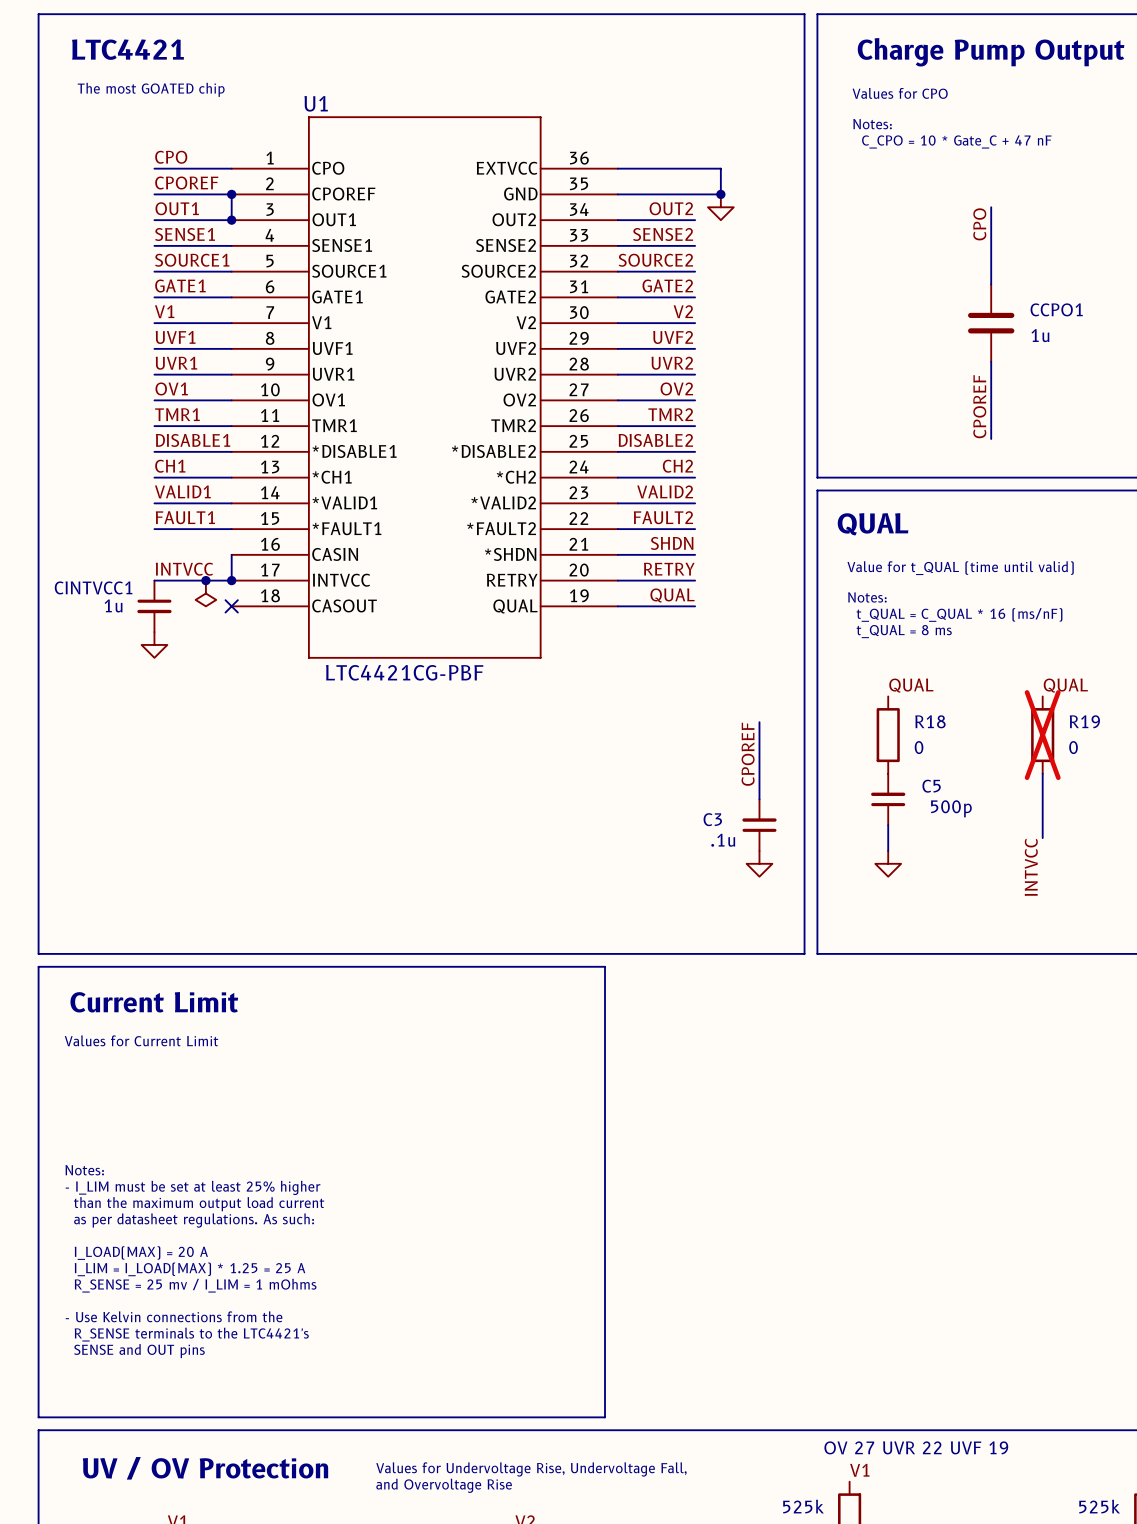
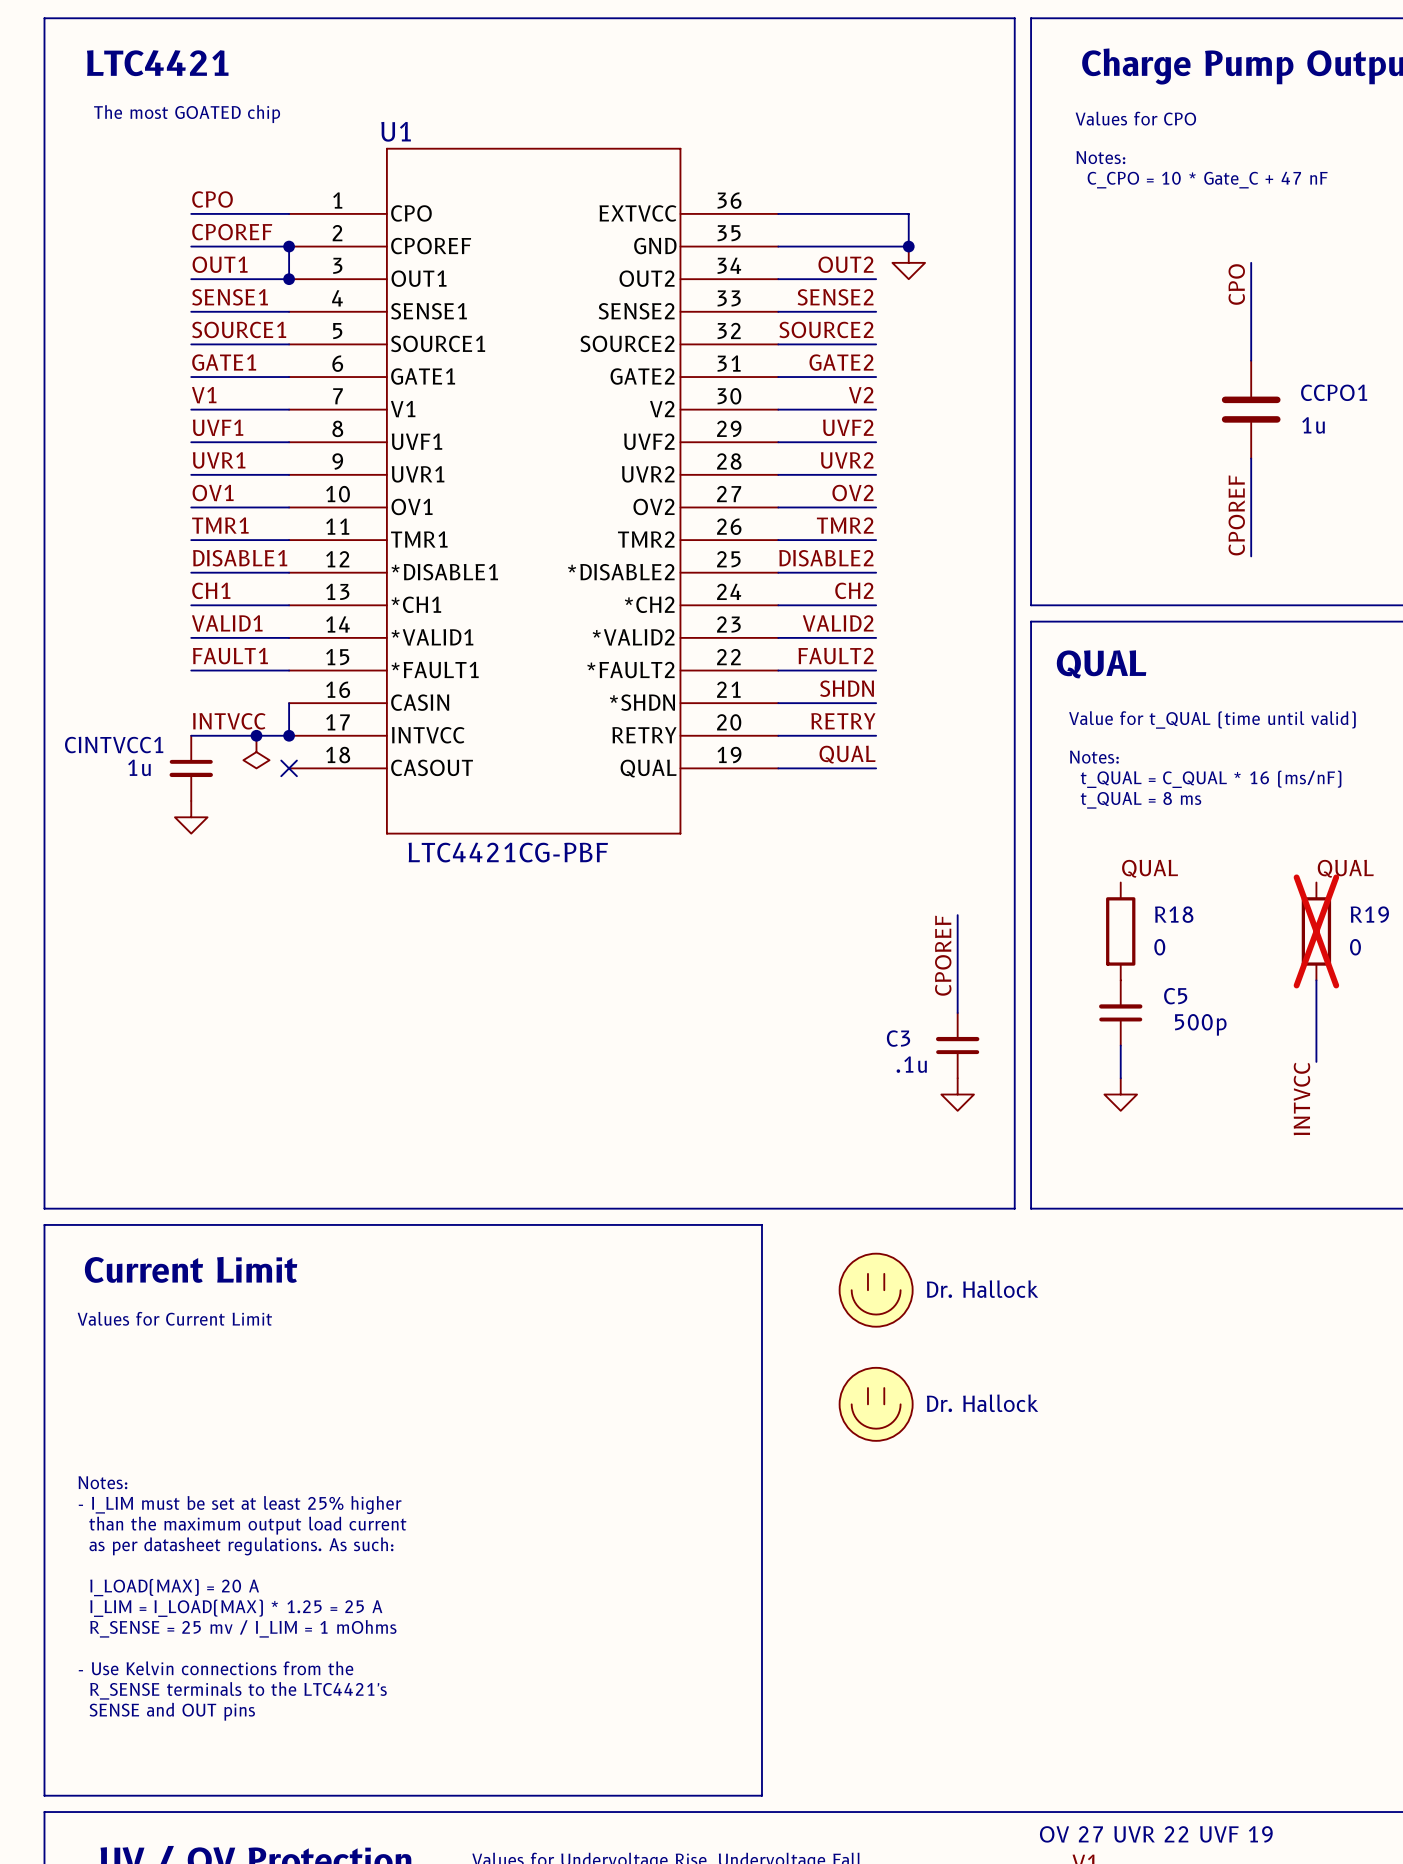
part: none -> Dr. Hallock (876, 1290)
part: none -> Dr. Hallock (876, 1404)

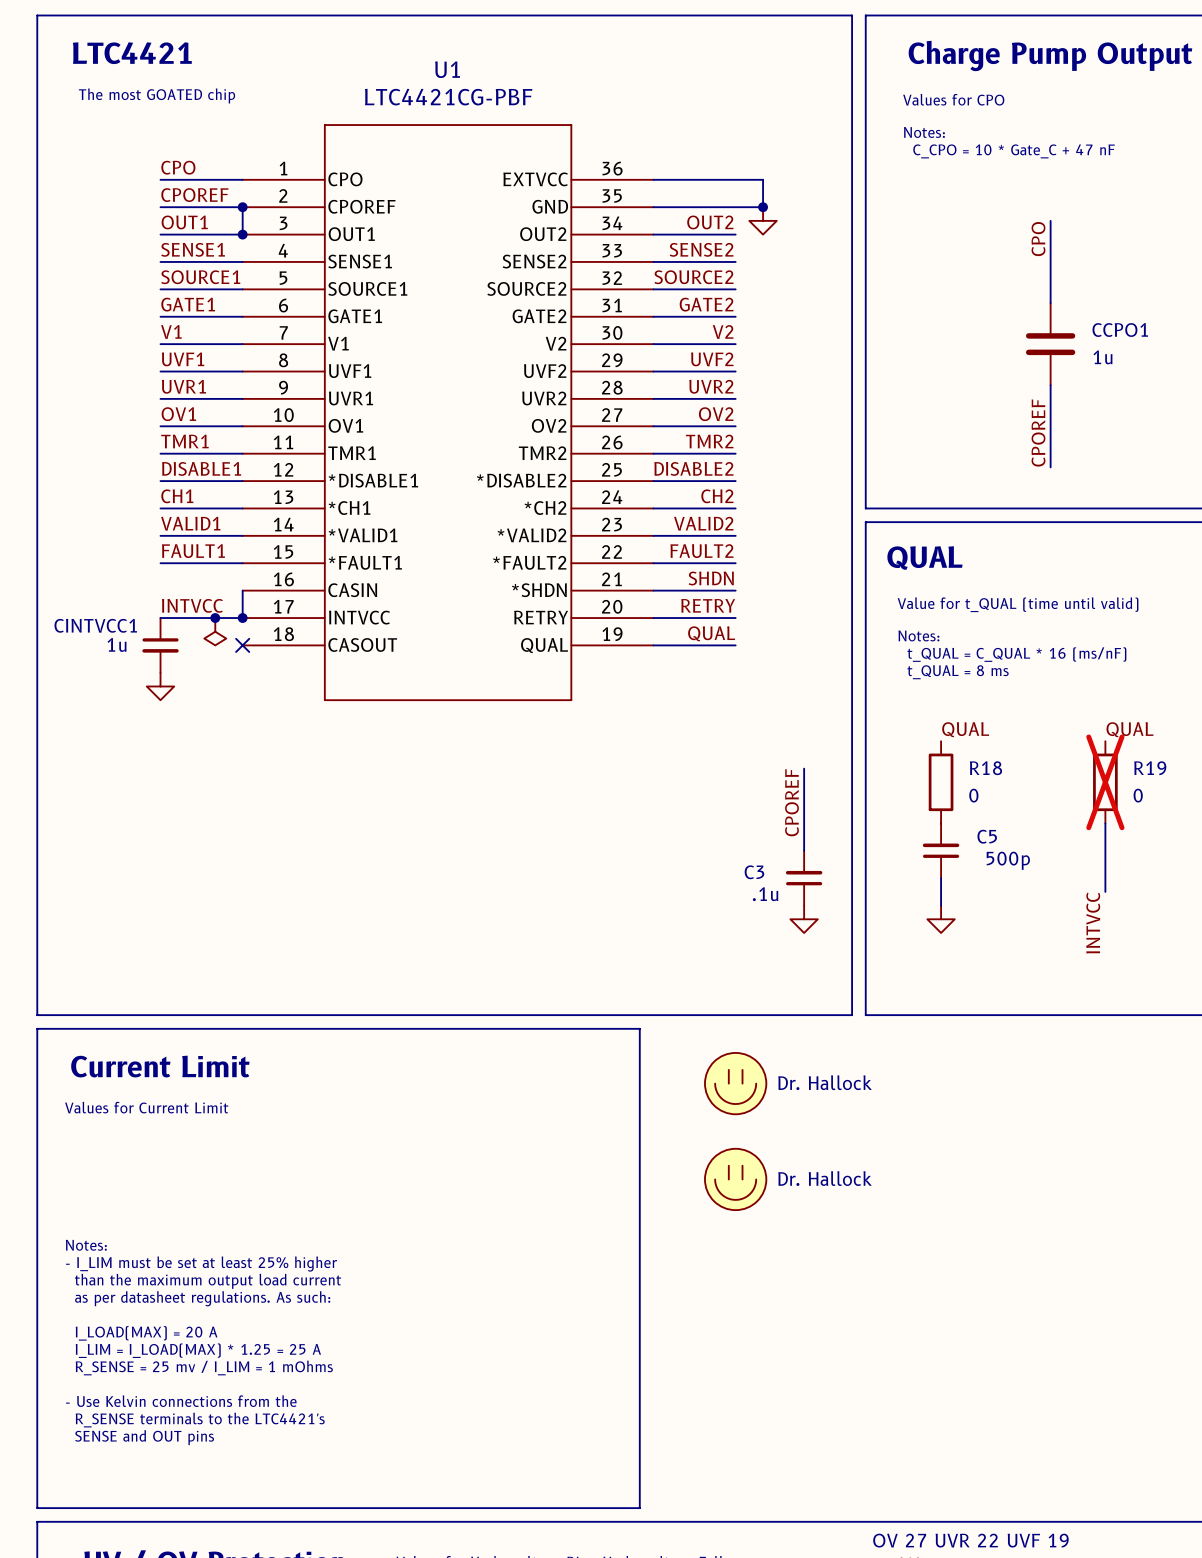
U1 name position: U1 (396, 131) -> U1 (447, 69)
U1 value position: LTC4421CG-PBF (508, 852) -> LTC4421CG-PBF (448, 97)

